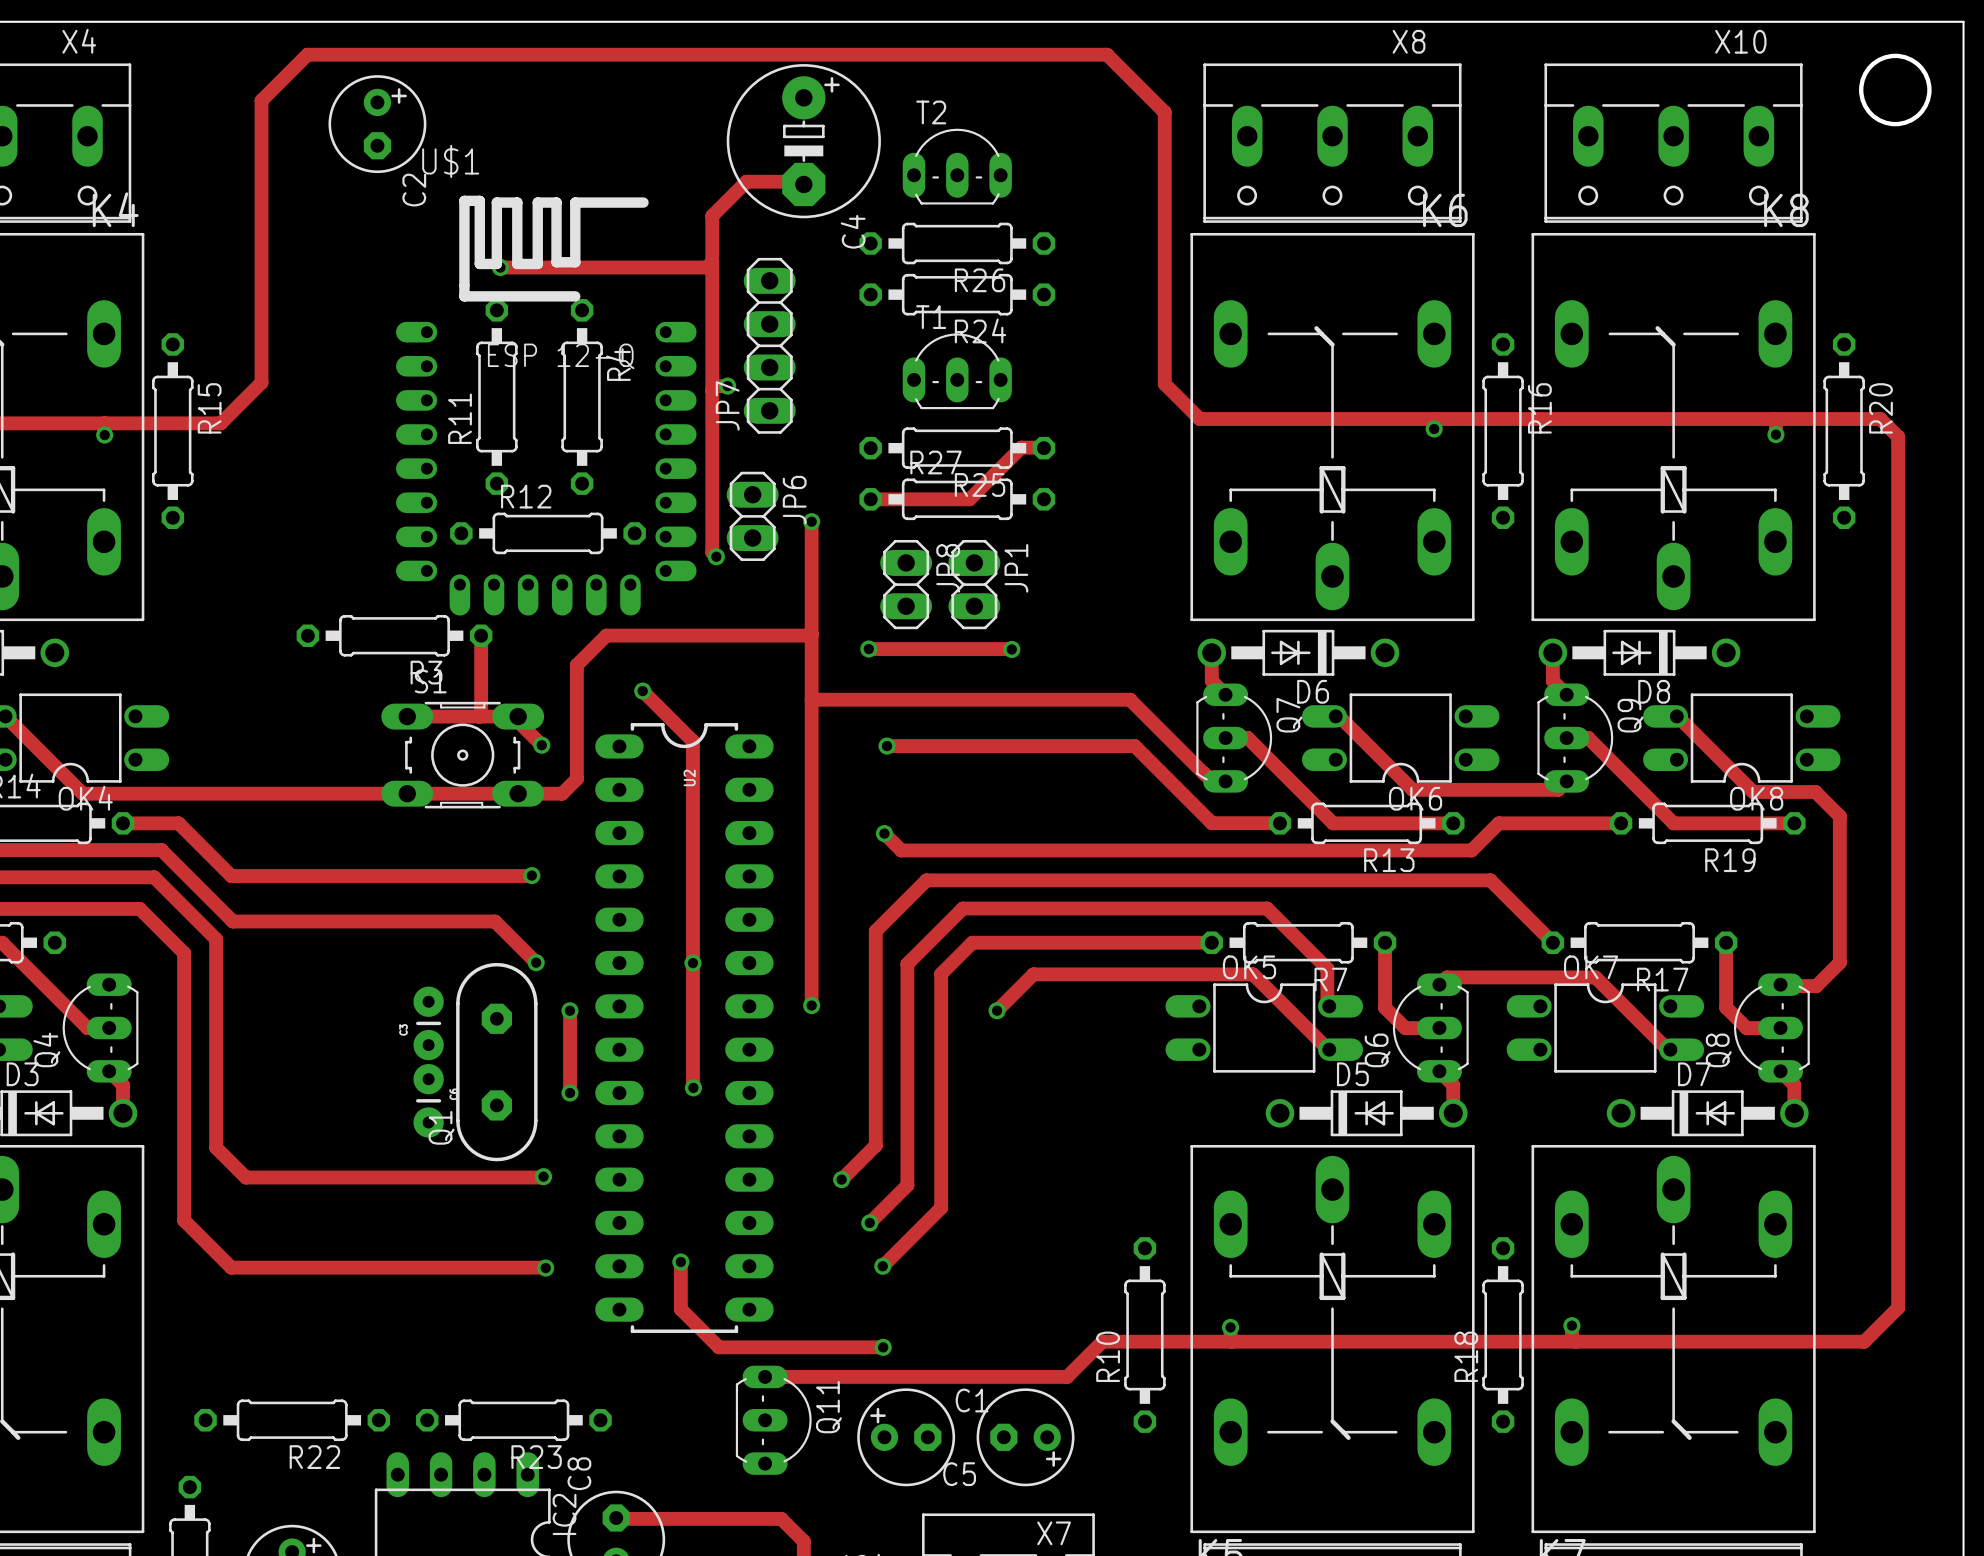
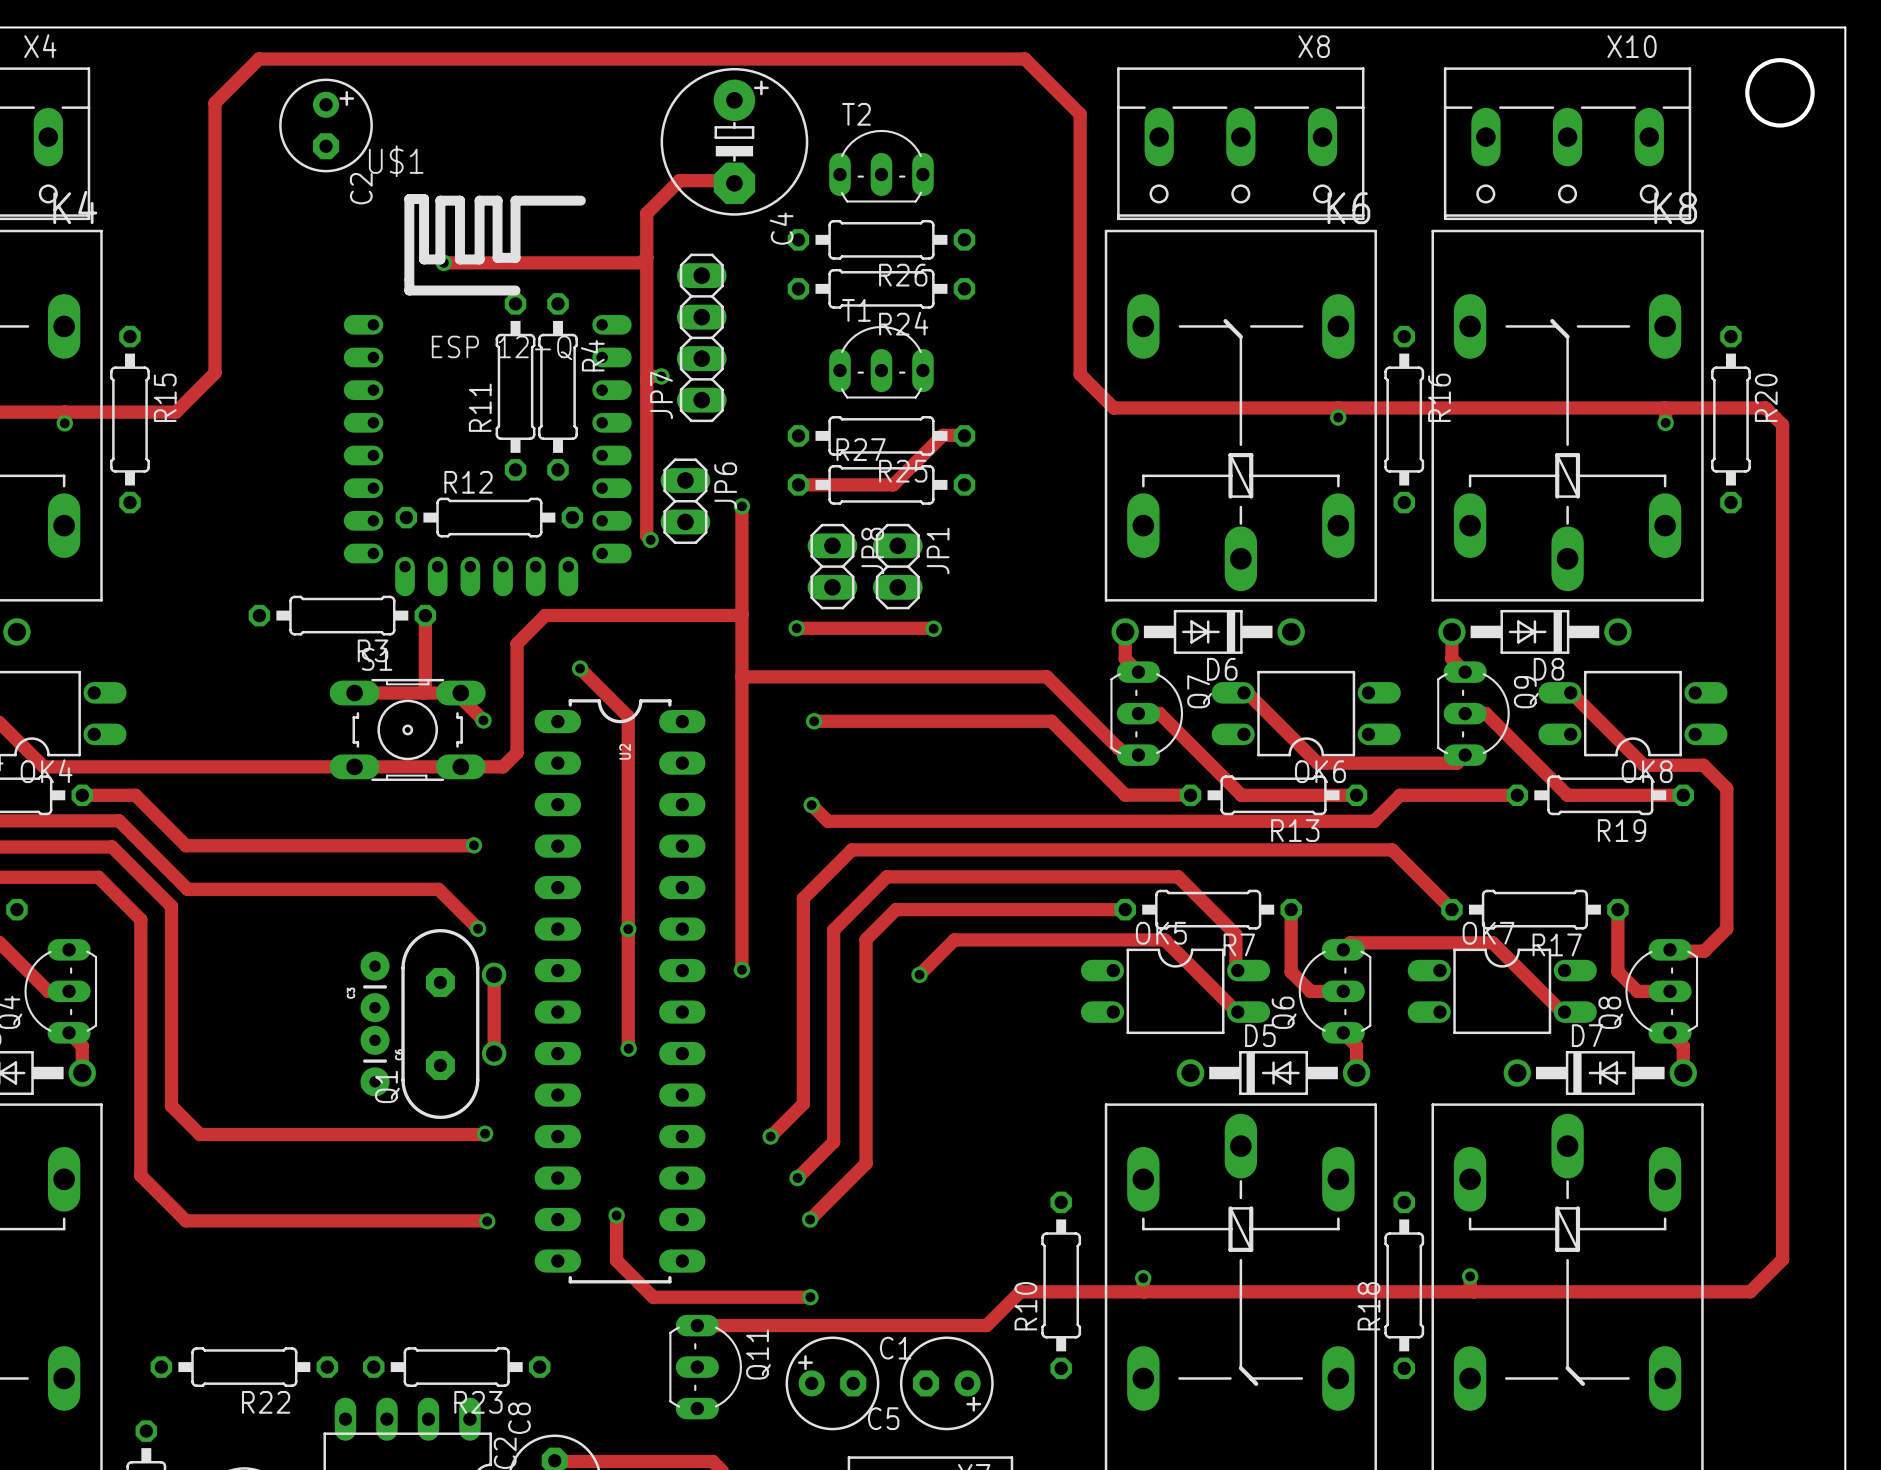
R11 position: (496, 396) -> (515, 386)
R4 position: (582, 396) -> (558, 386)
via position: (569, 1010) -> (494, 974)
track: (570, 1010) (570, 1092) -> (494, 974) (494, 1053)
via position: (570, 1092) -> (494, 1053)

